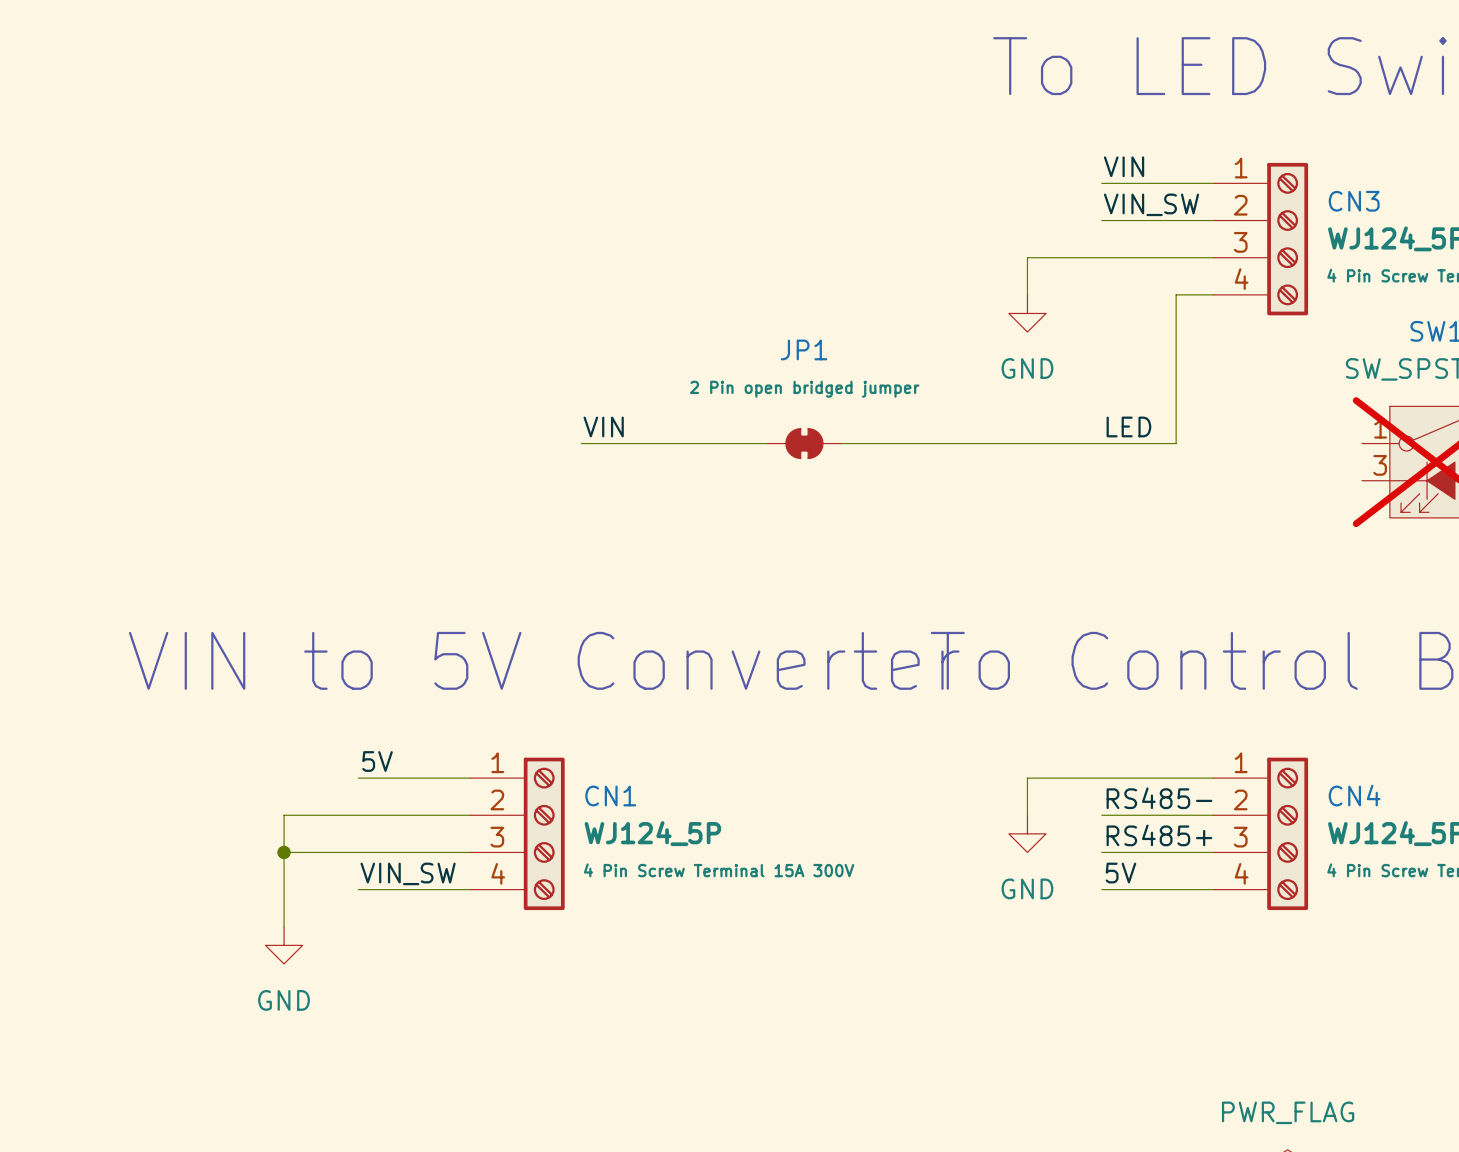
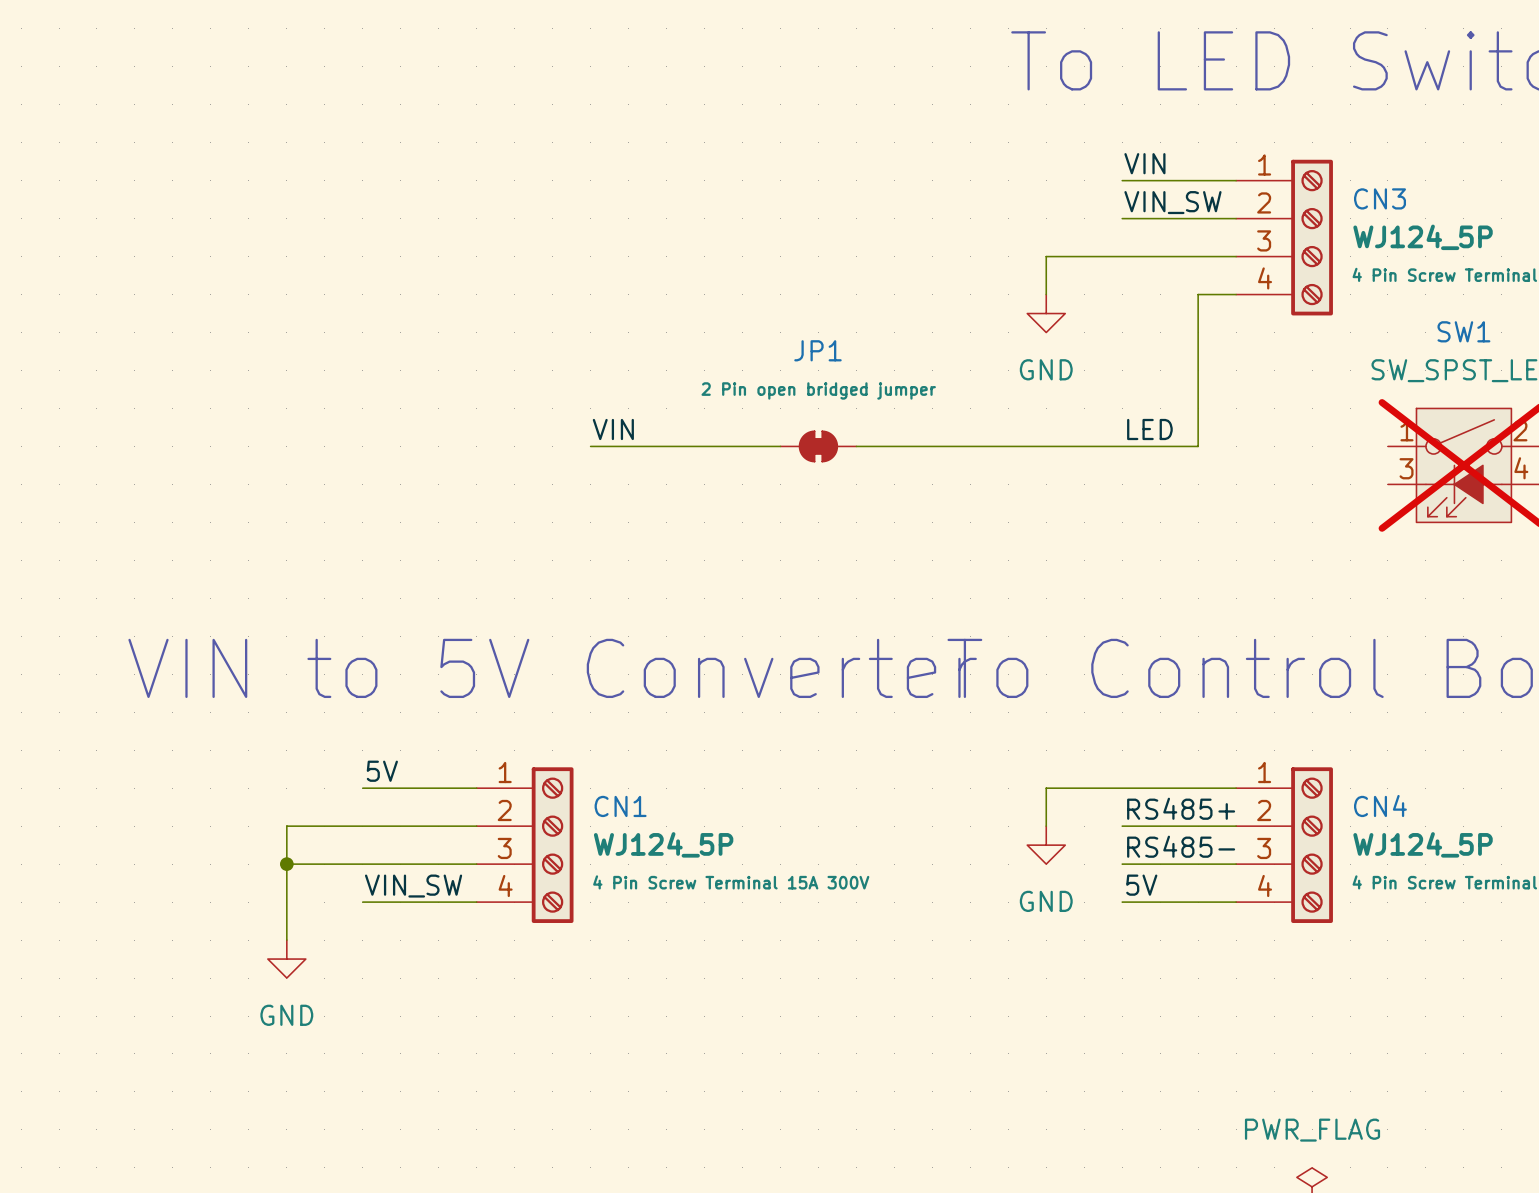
label: RS485- (1159, 798) -> RS485+ (1181, 808)
label: RS485+ (1159, 835) -> RS485- (1181, 846)

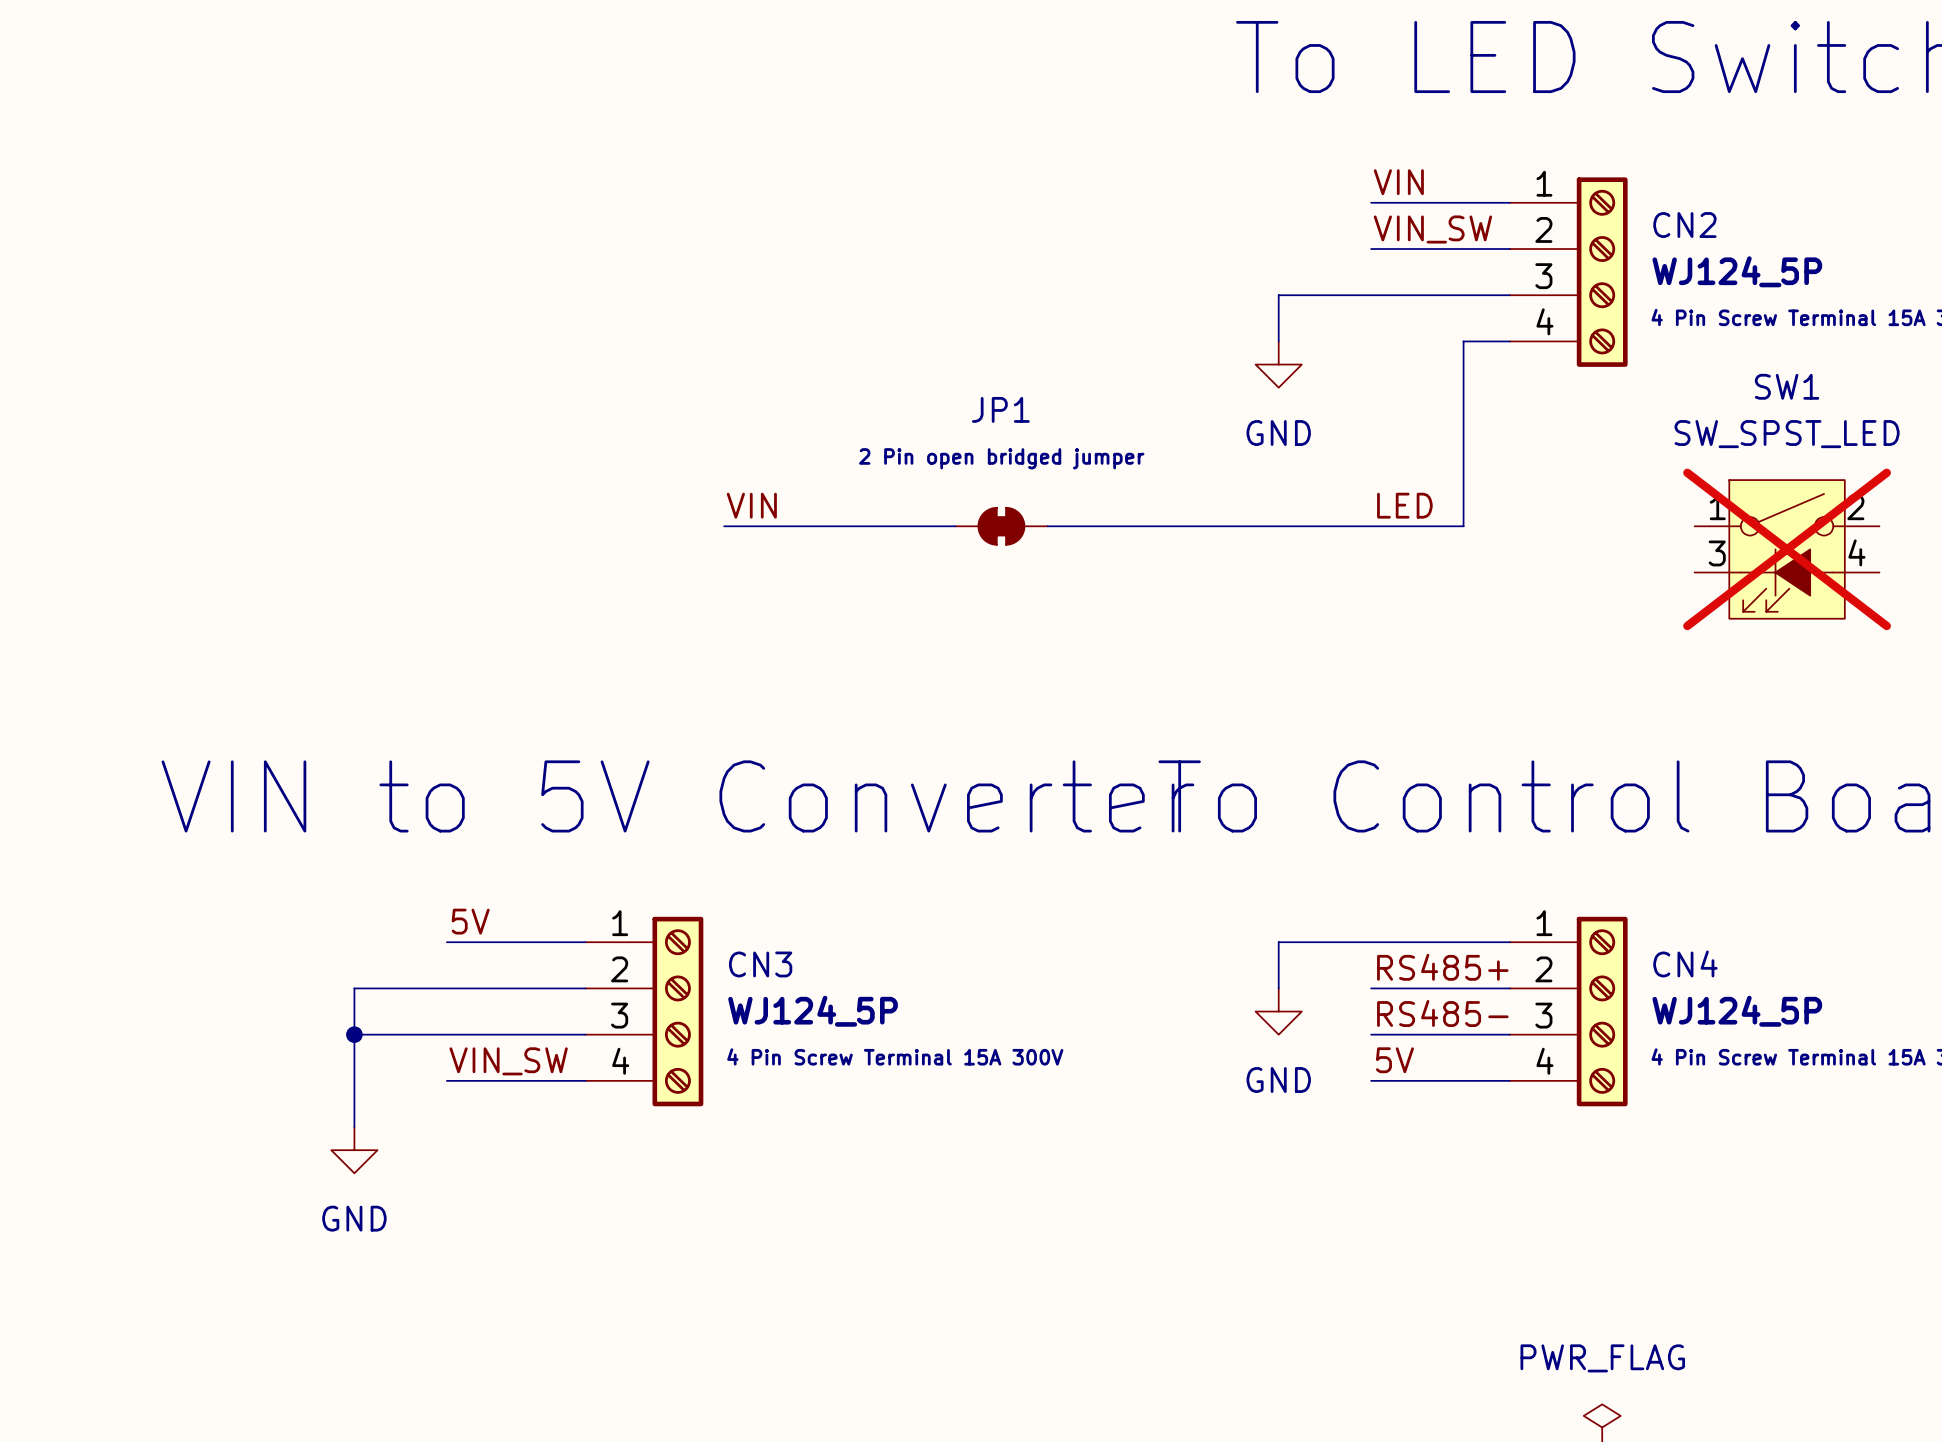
CN3 name: CN3 (1380, 198) -> CN2 (1684, 225)
CN1 name: CN1 (620, 806) -> CN3 (760, 964)

